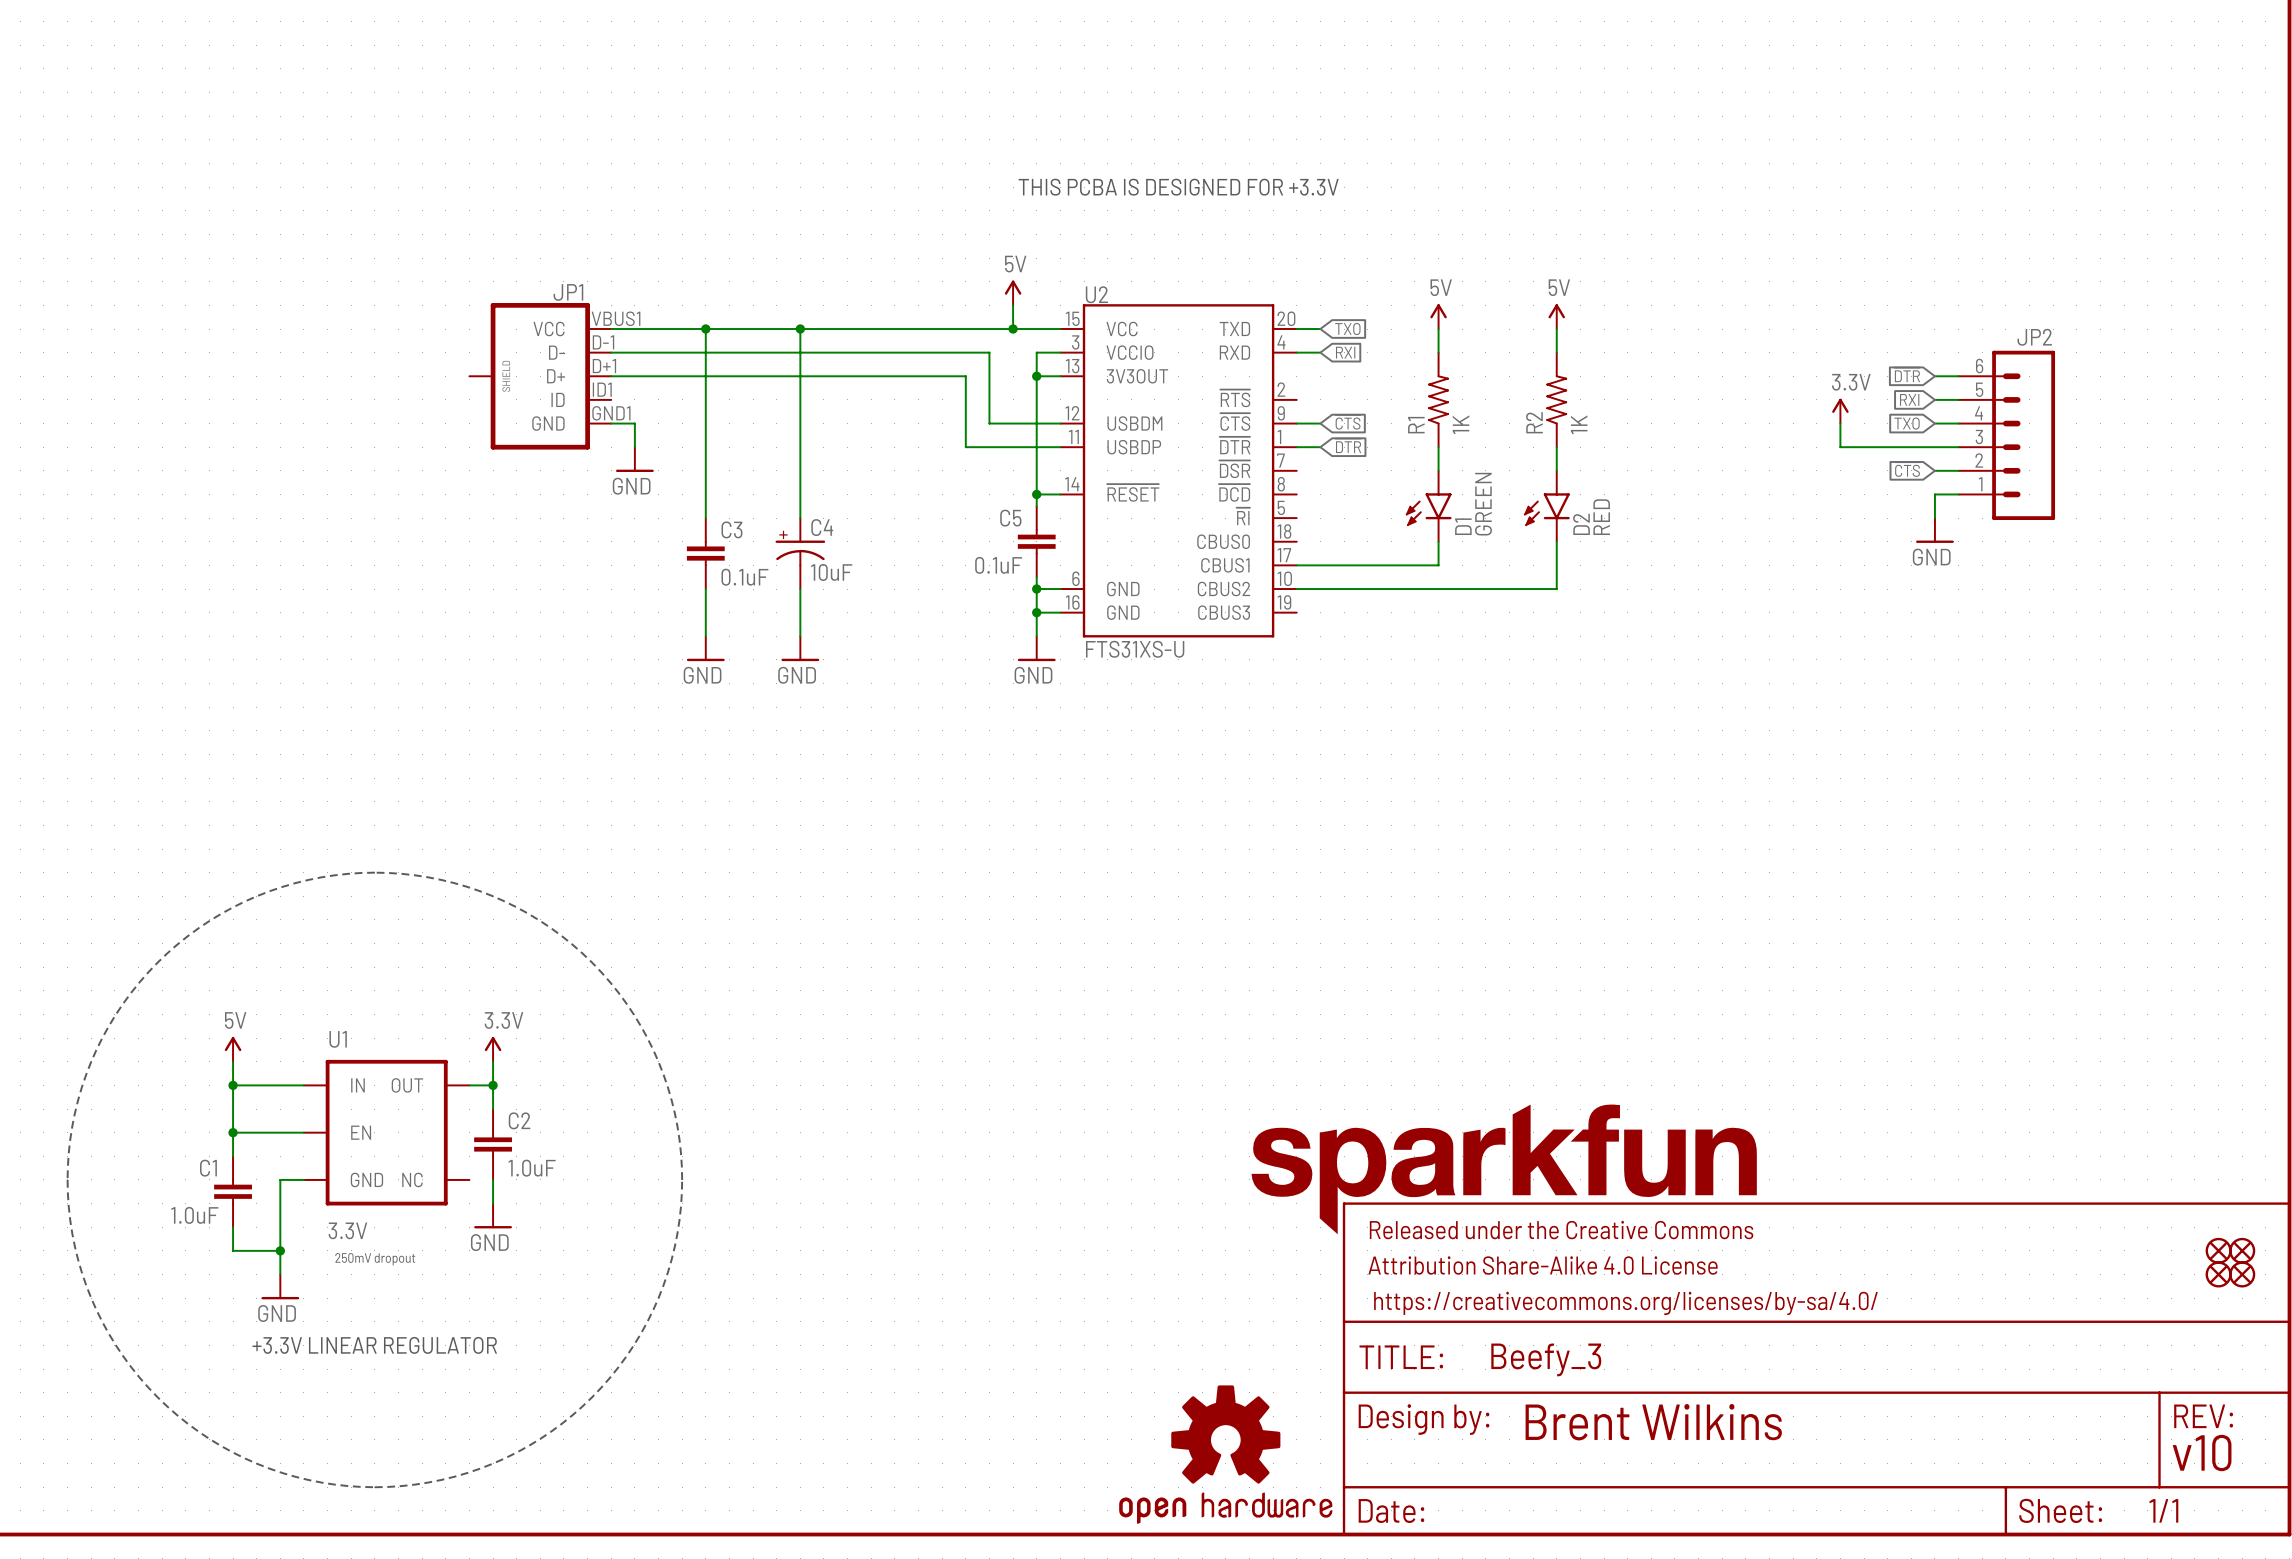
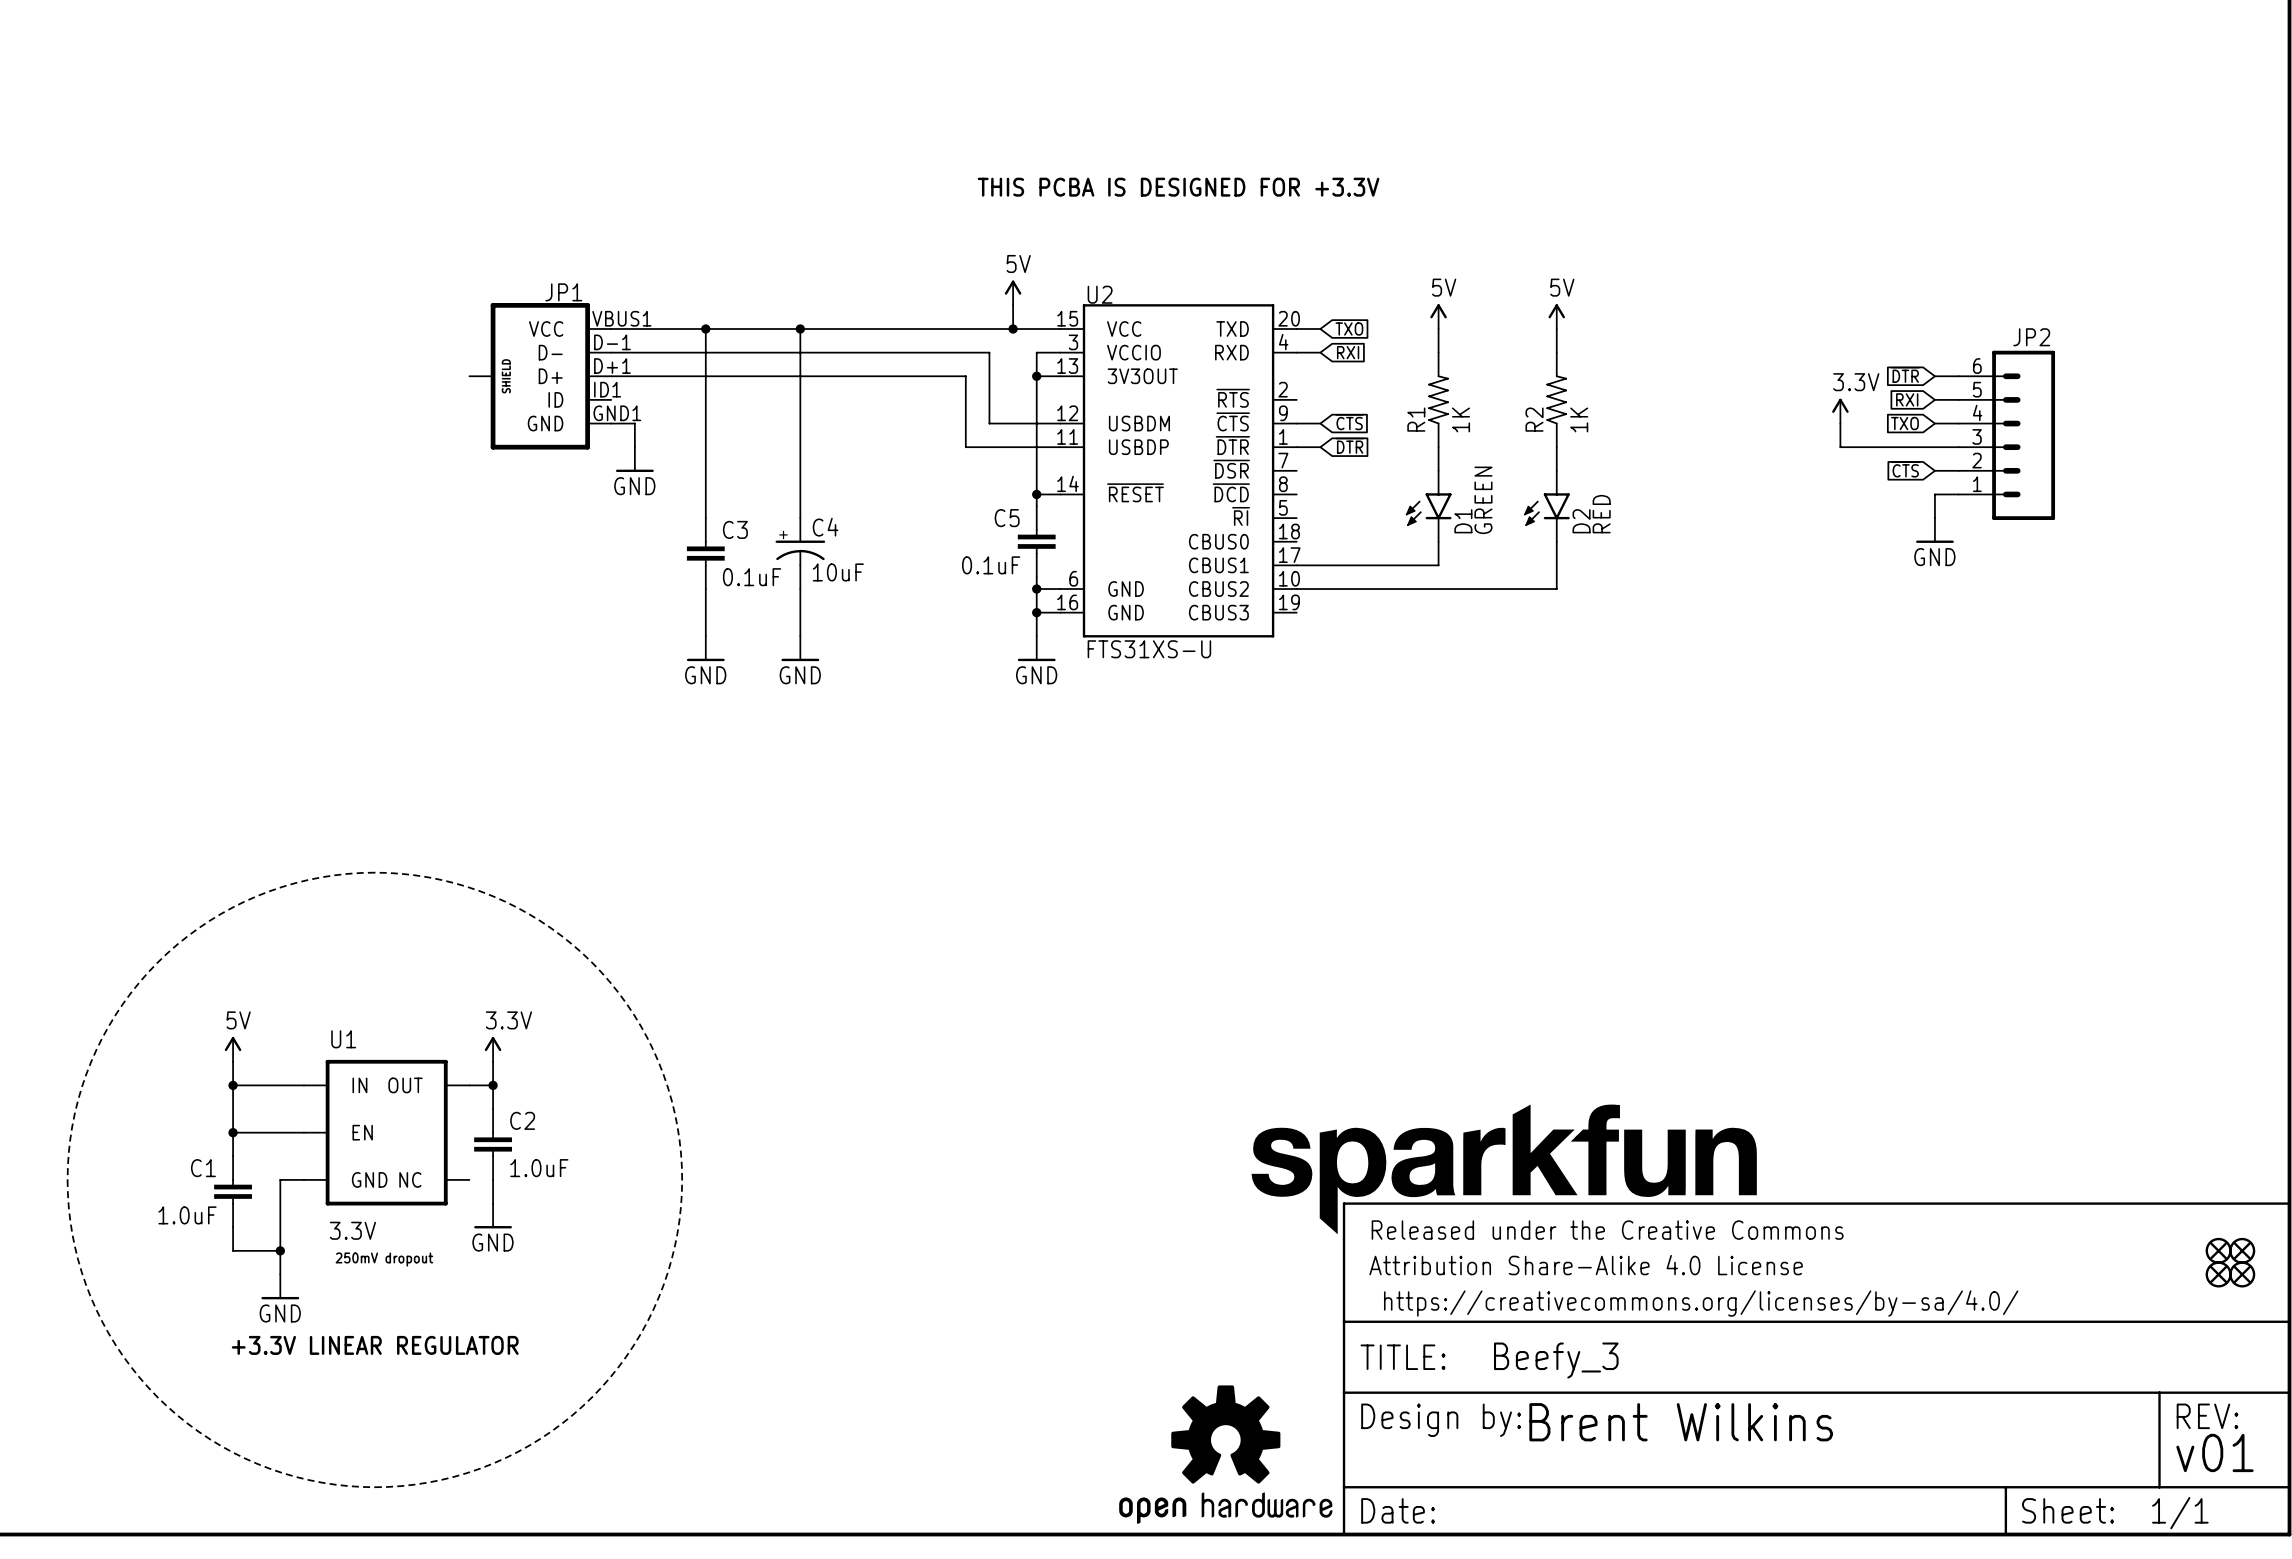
text: v10 (2202, 1452) -> v01 (2214, 1452)

